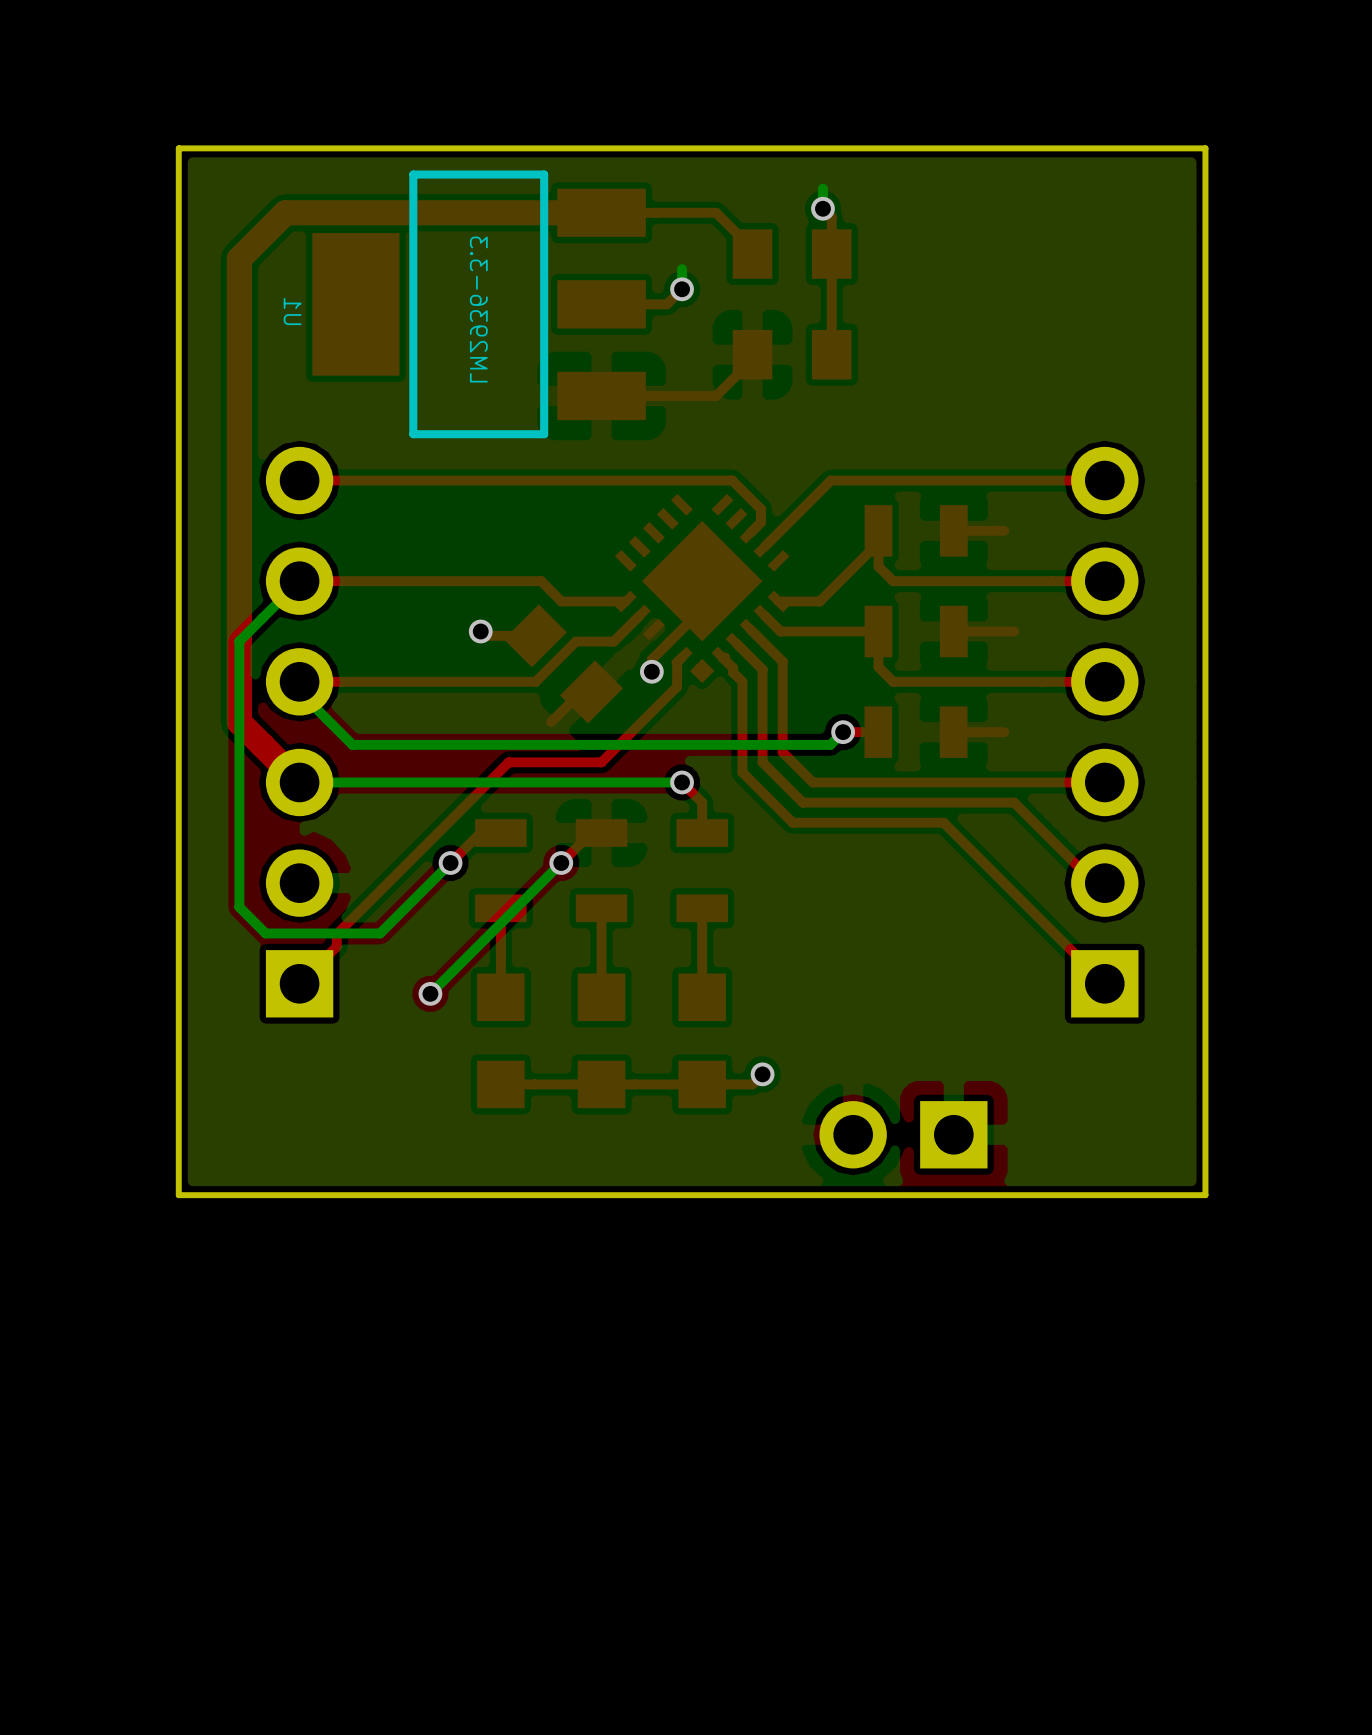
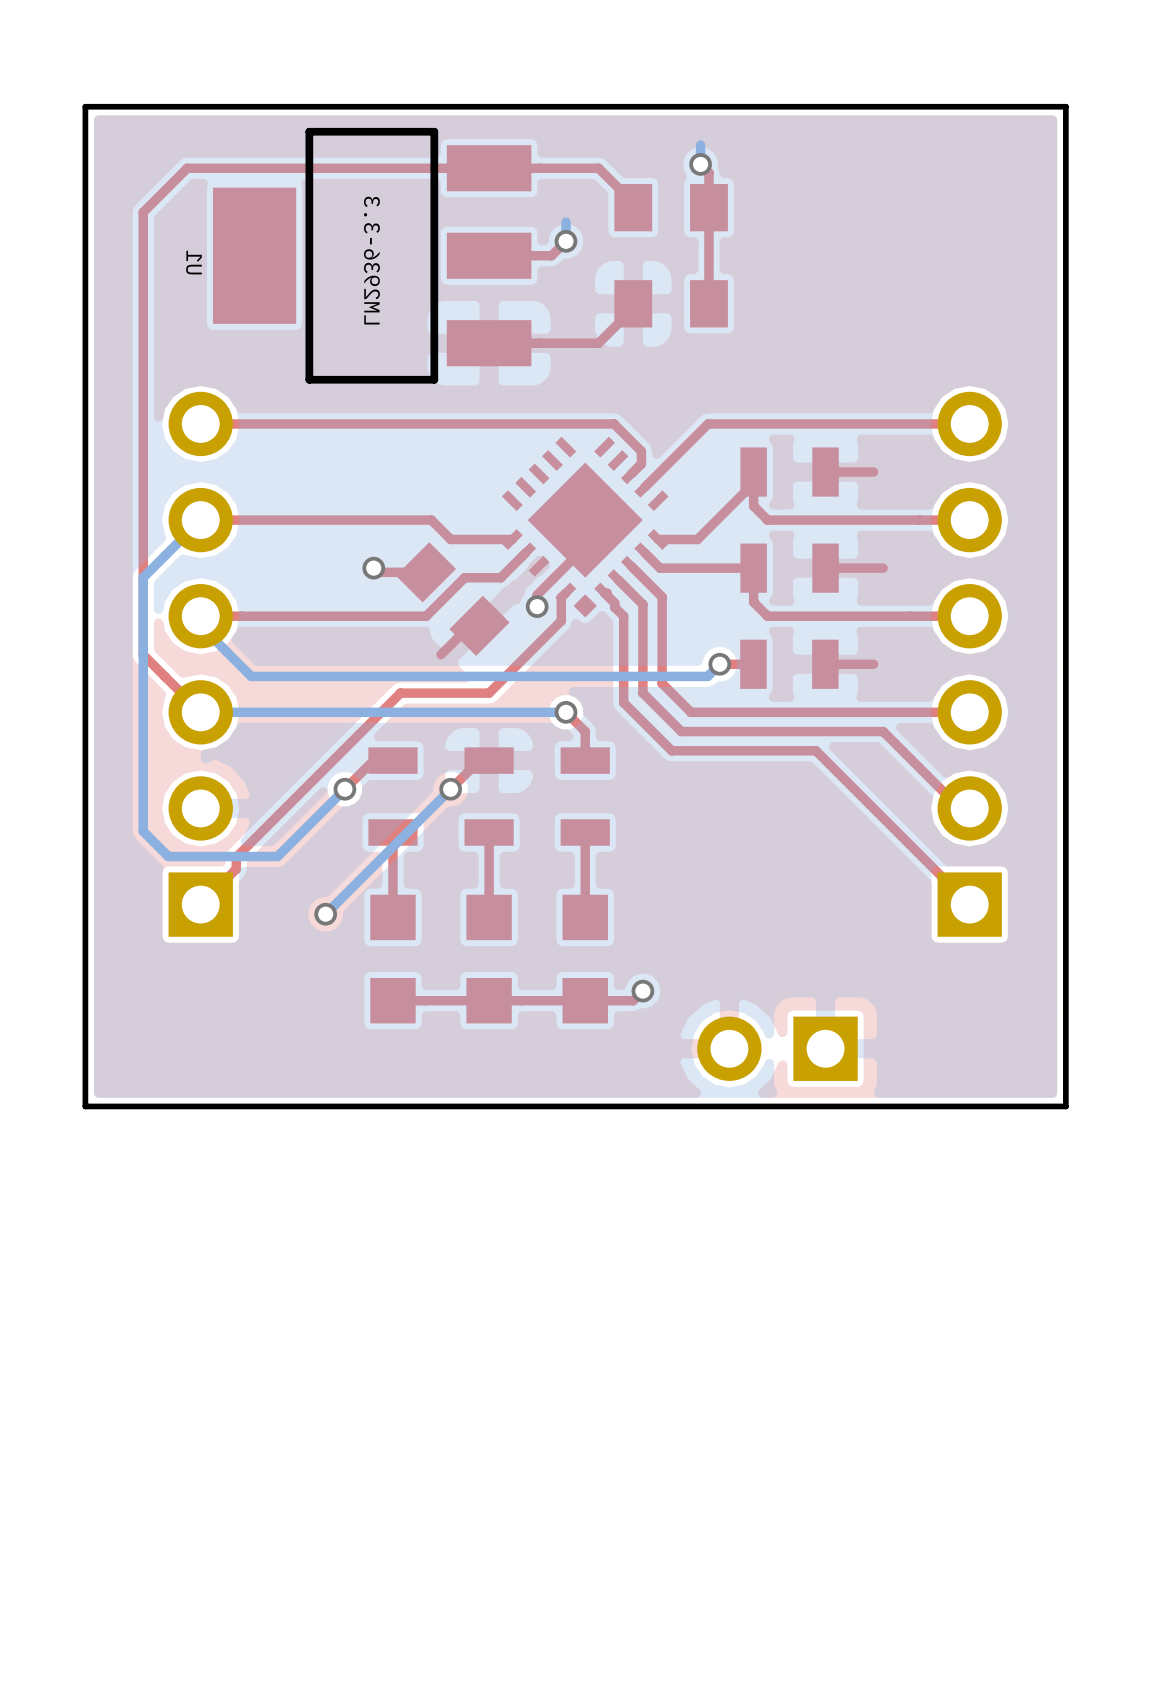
top track width: thick (601, 212) (285, 212) (239, 258) (239, 722) (299, 782) -> thin (489, 168) (187, 168) (143, 212) (143, 654) (200, 712)

